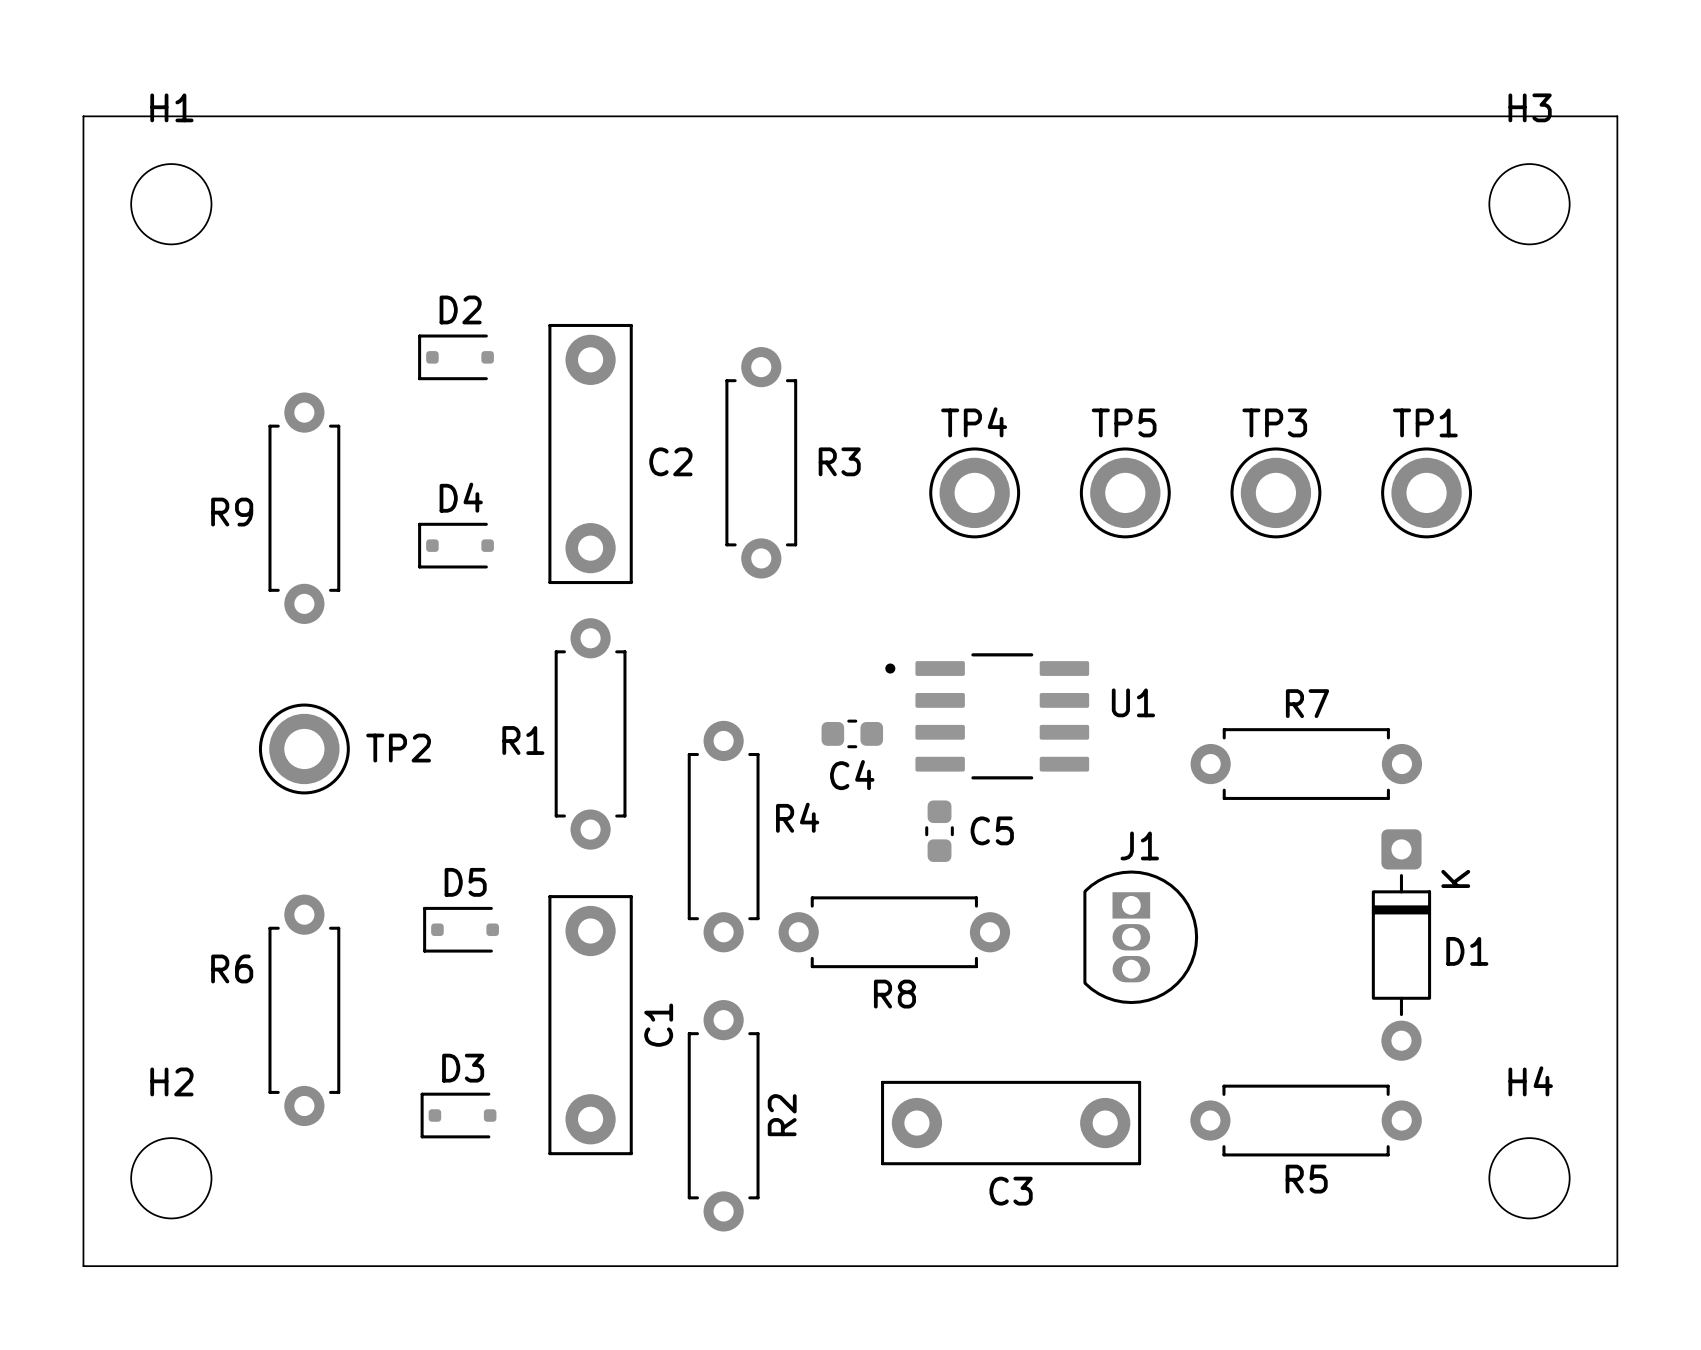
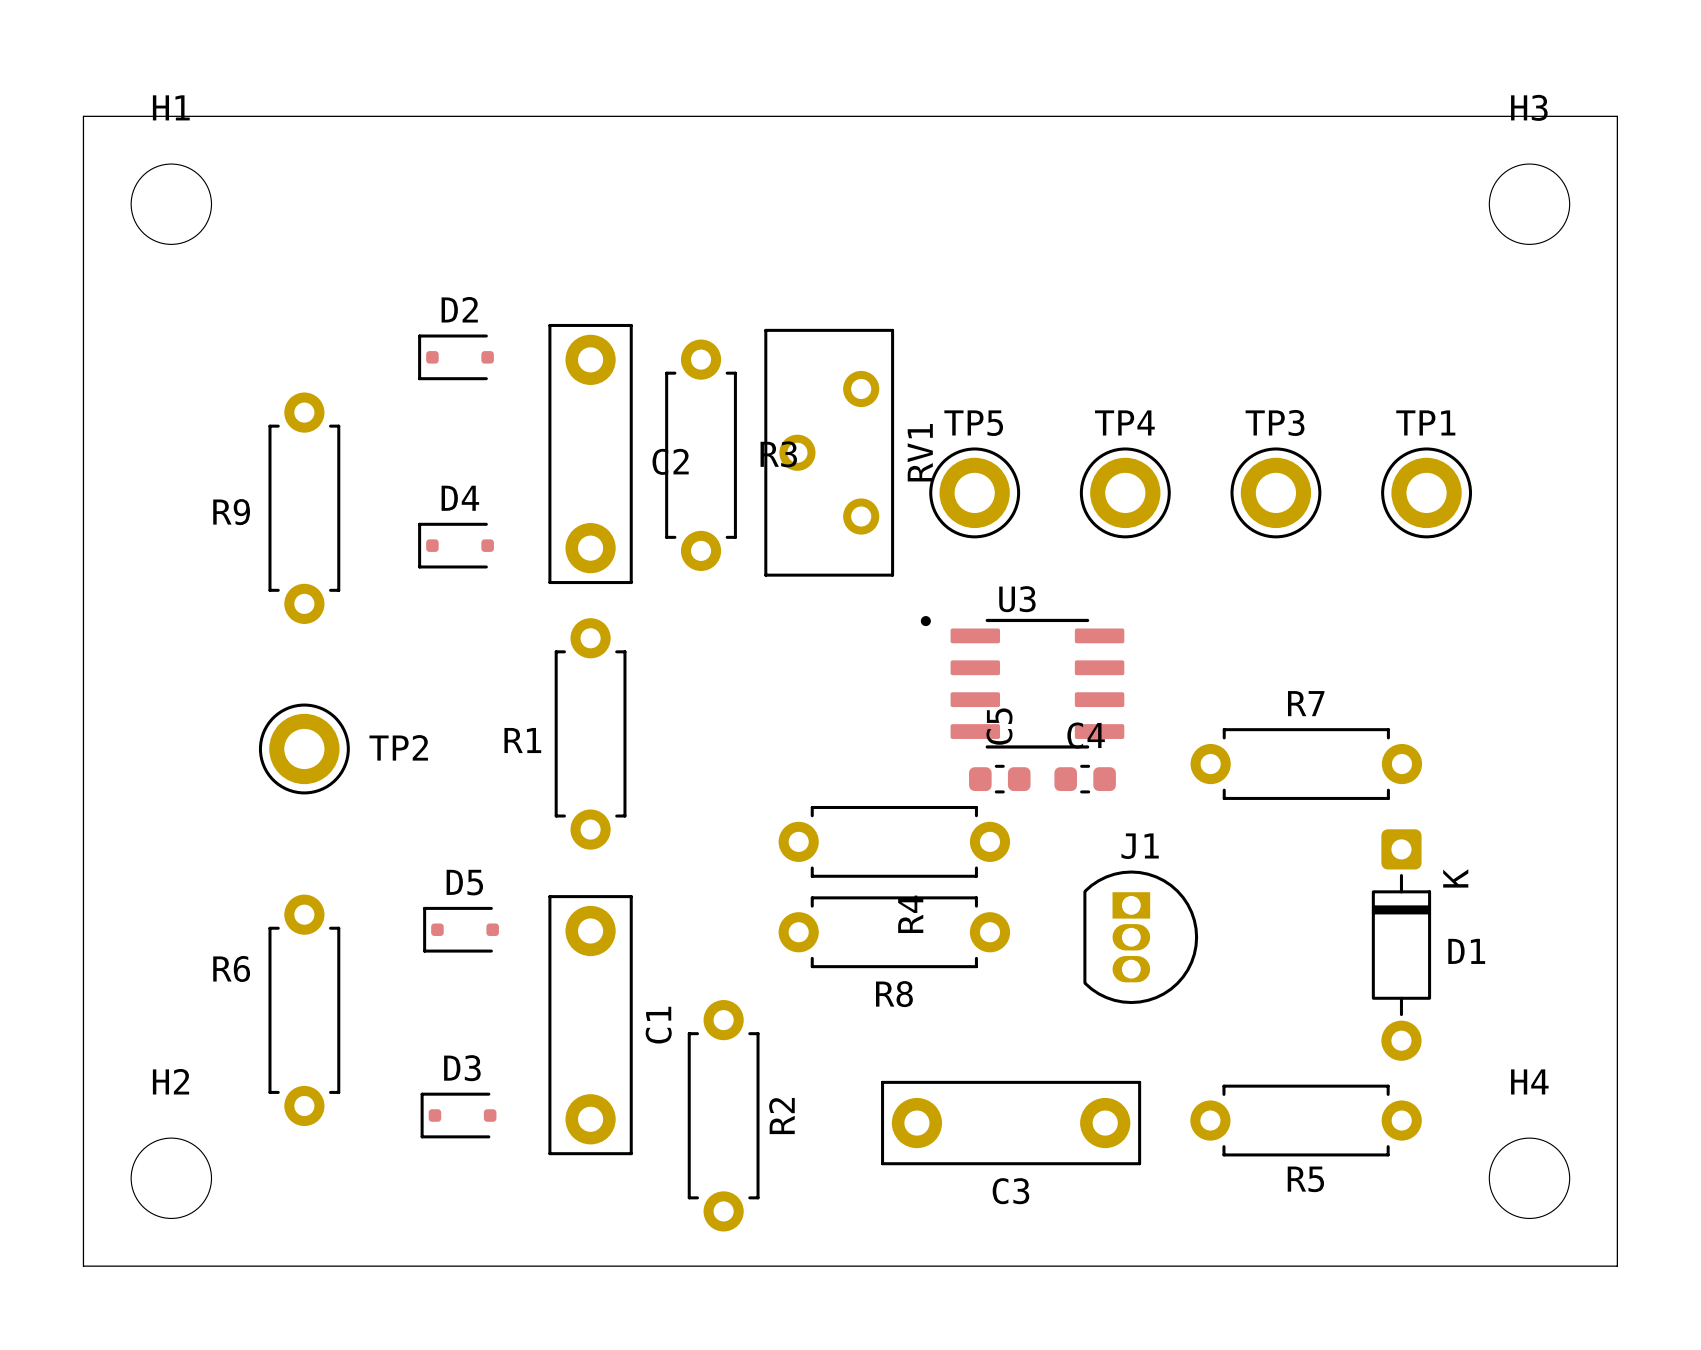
TP4 name: TP4 (974, 422) -> TP5 (973, 423)
TP5 name: TP5 (1124, 422) -> TP4 (1124, 422)
RV1: none -> (829, 452)
R3 position: (761, 462) -> (701, 455)
U3: none -> (1022, 682)
U1: (987, 716) -> none
C4 position: (852, 733) -> (1085, 779)
C4 name position: C4 (852, 775) -> C4 (1086, 735)
C5 name position: C5 (992, 830) -> C5 (999, 726)
C5 rotation: 0° (939, 831) -> 90° clockwise (999, 779)
C5 position: (939, 831) -> (999, 779)
R4 rotation: 0° (723, 836) -> 90° clockwise (894, 841)
R4 position: (723, 836) -> (894, 841)

